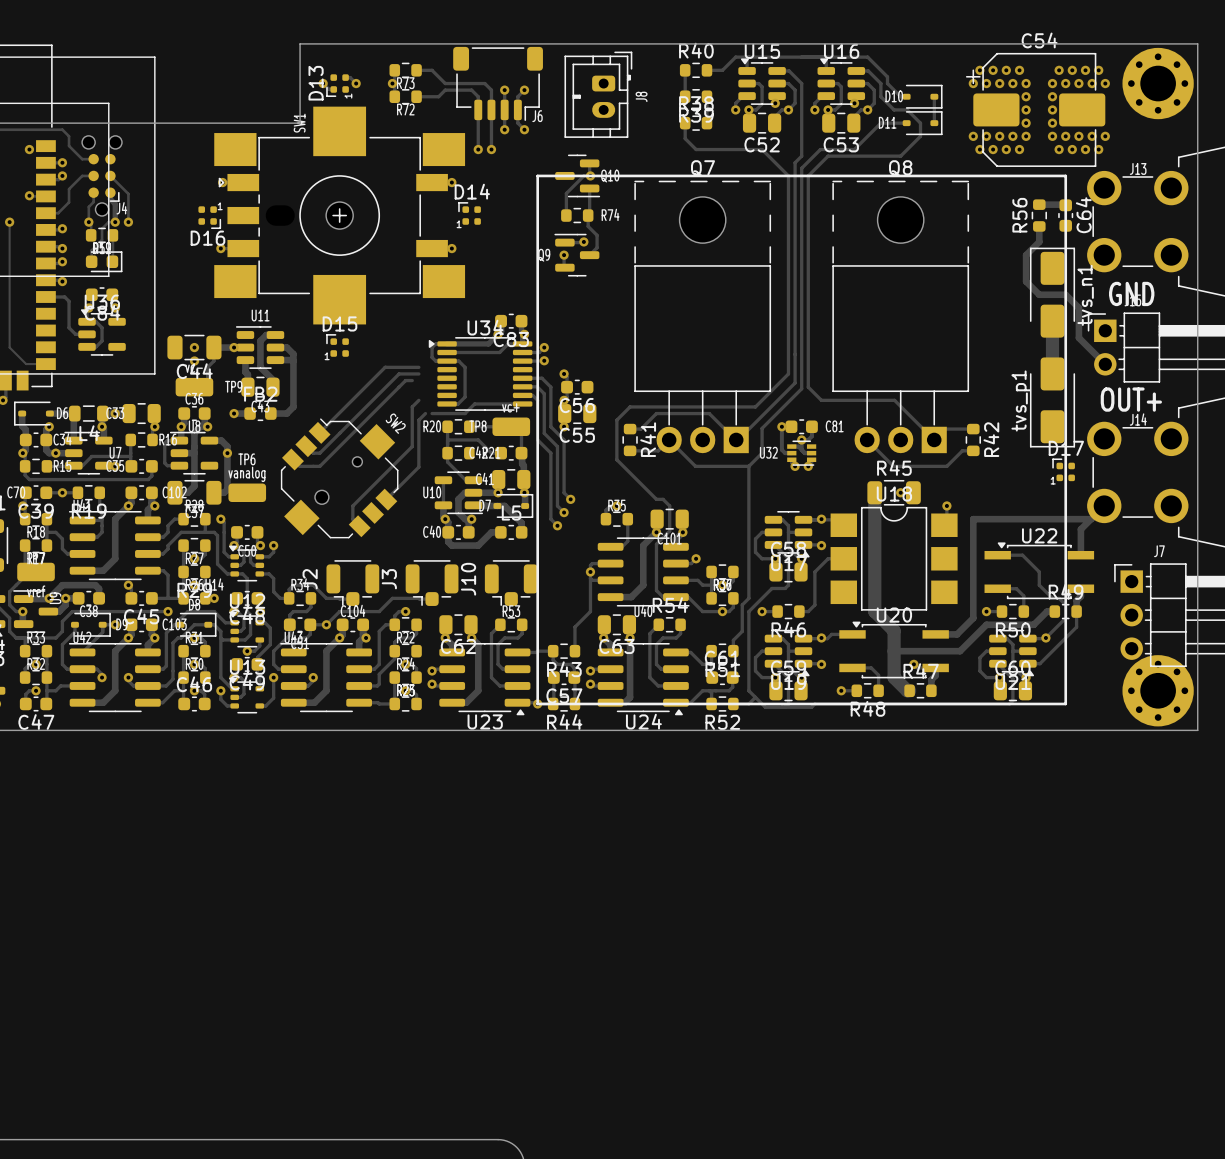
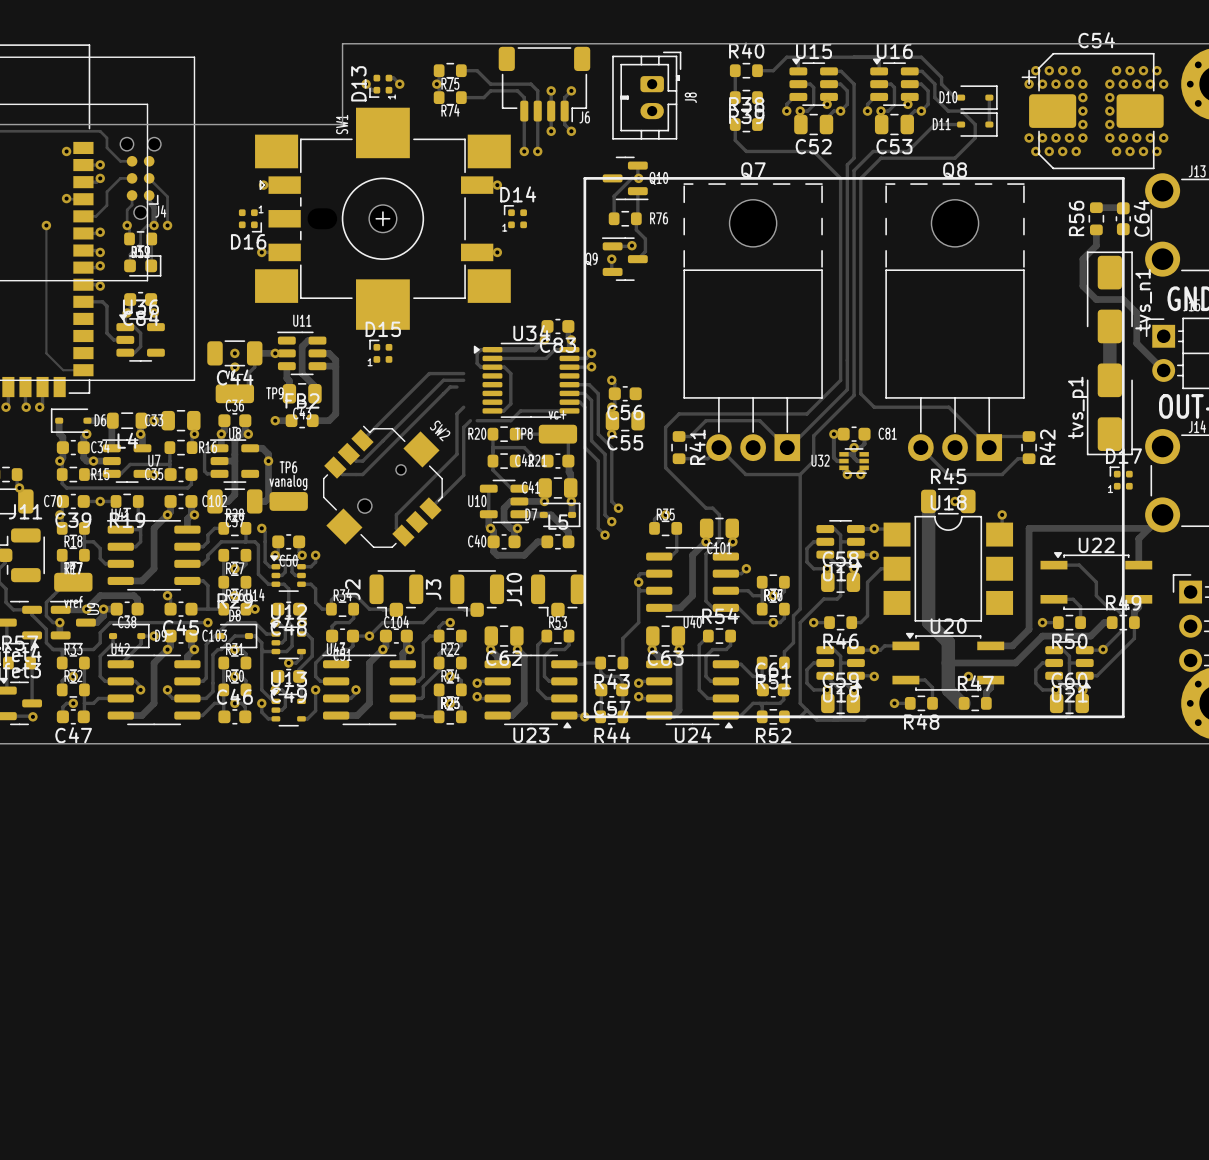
R73 name: R73 (405, 83) -> R75 (450, 83)
R72 name: R72 (405, 109) -> R74 (450, 110)
R74 name: R74 (610, 214) -> R76 (659, 218)

